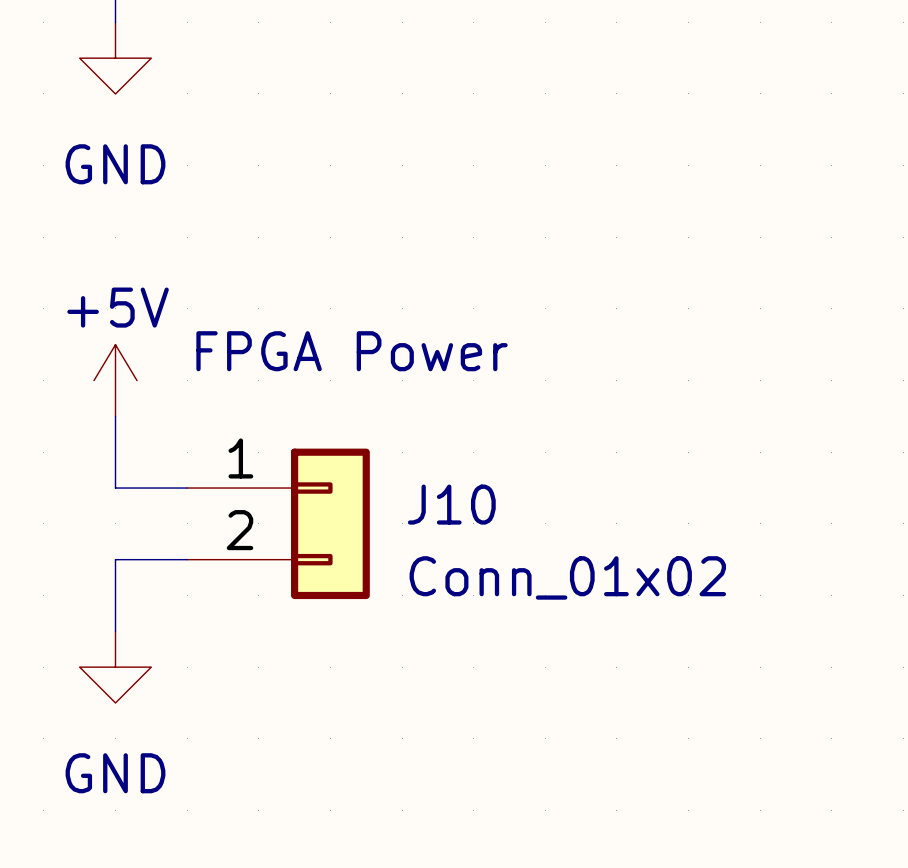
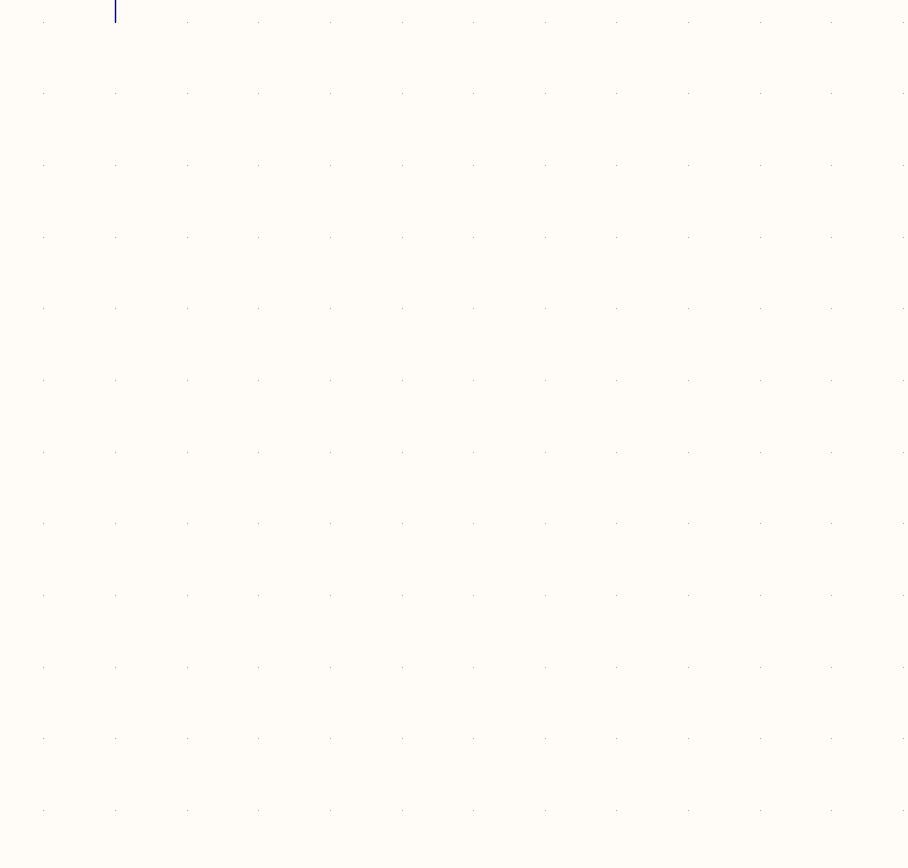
power symbol: GND (115, 58) -> none
text: FPGA Power (352, 351) -> none
power symbol: +5V (115, 380) -> none
wire: (115, 416) (115, 488) (187, 488) -> none
J10: Conn_01x02 (278, 523) -> none
wire: (187, 559) (115, 559) (115, 631) -> none
power symbol: GND (115, 667) -> none

